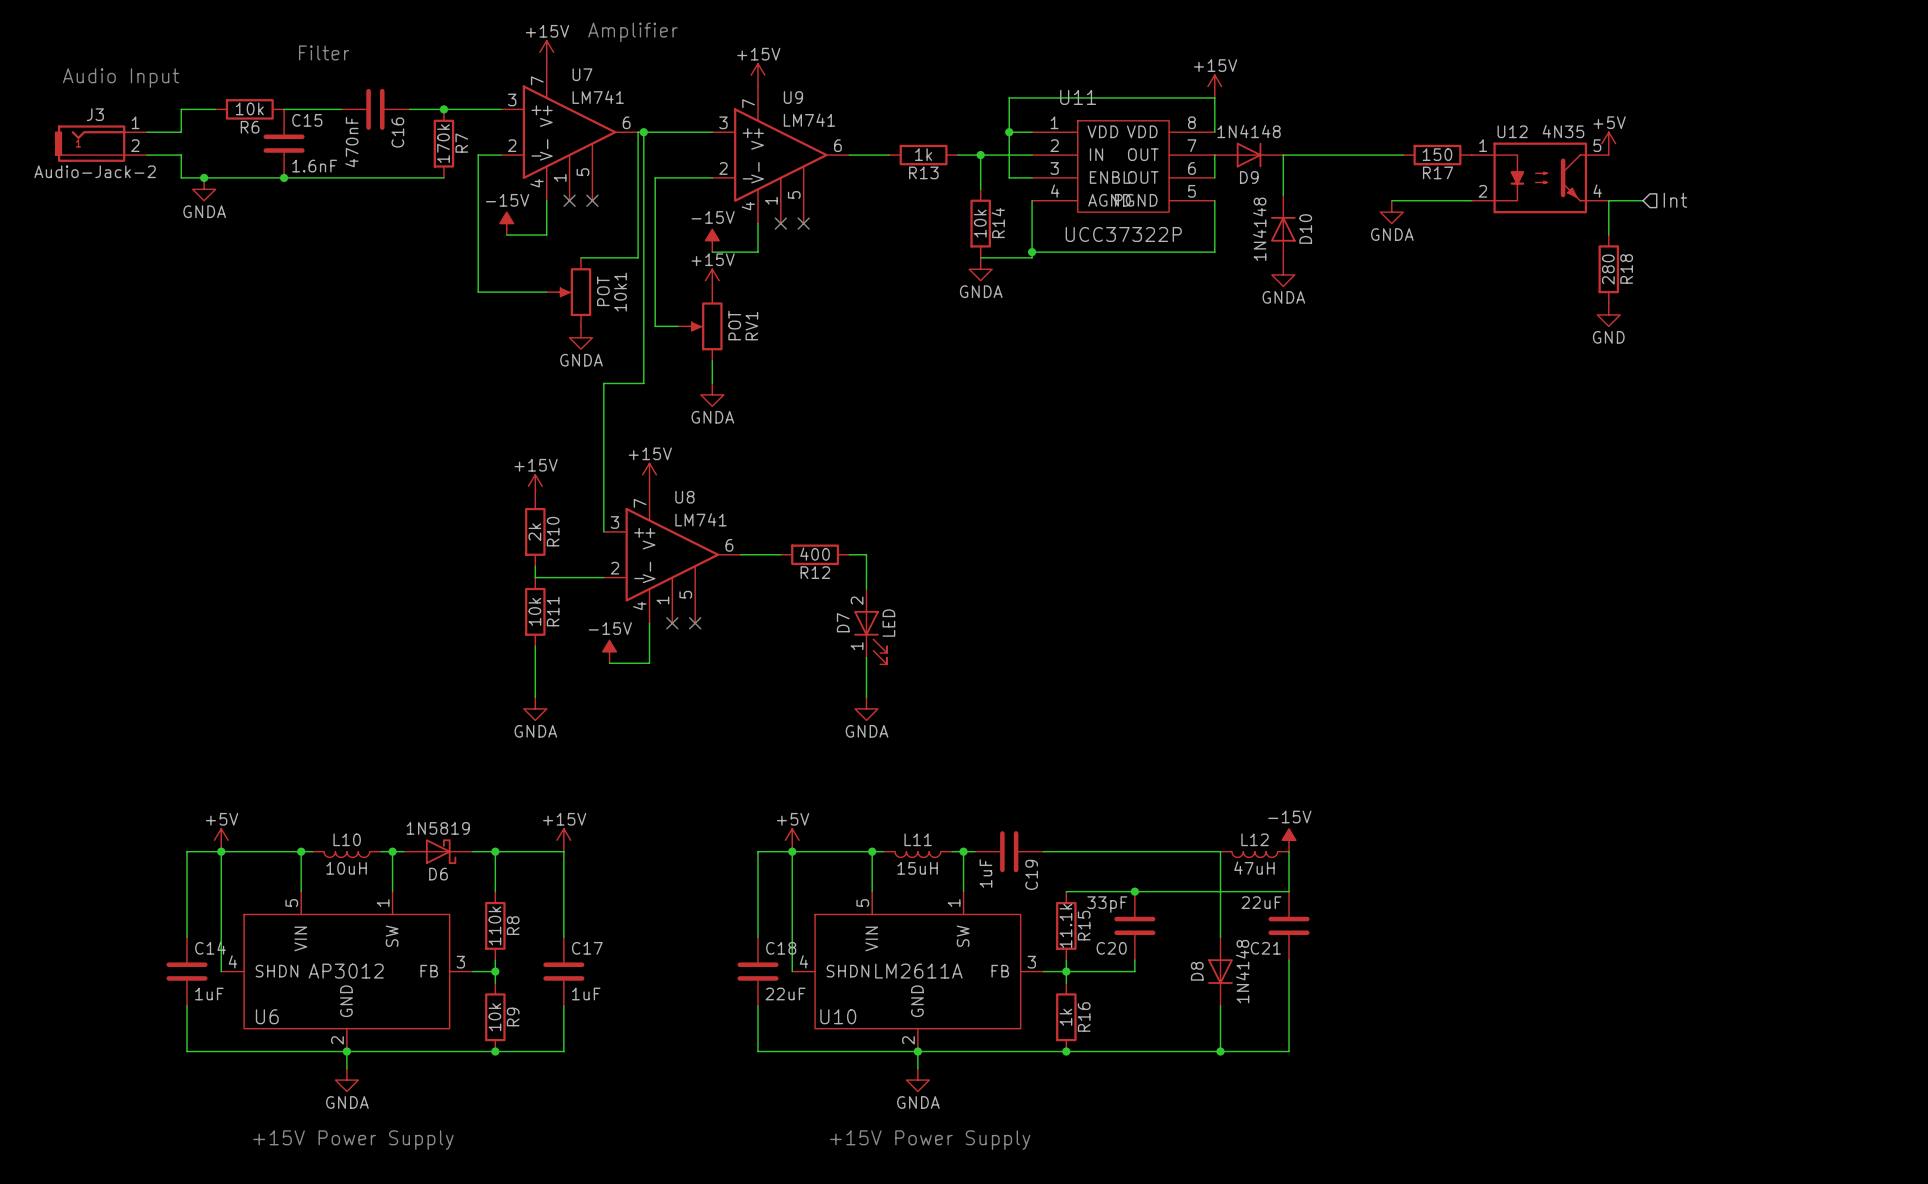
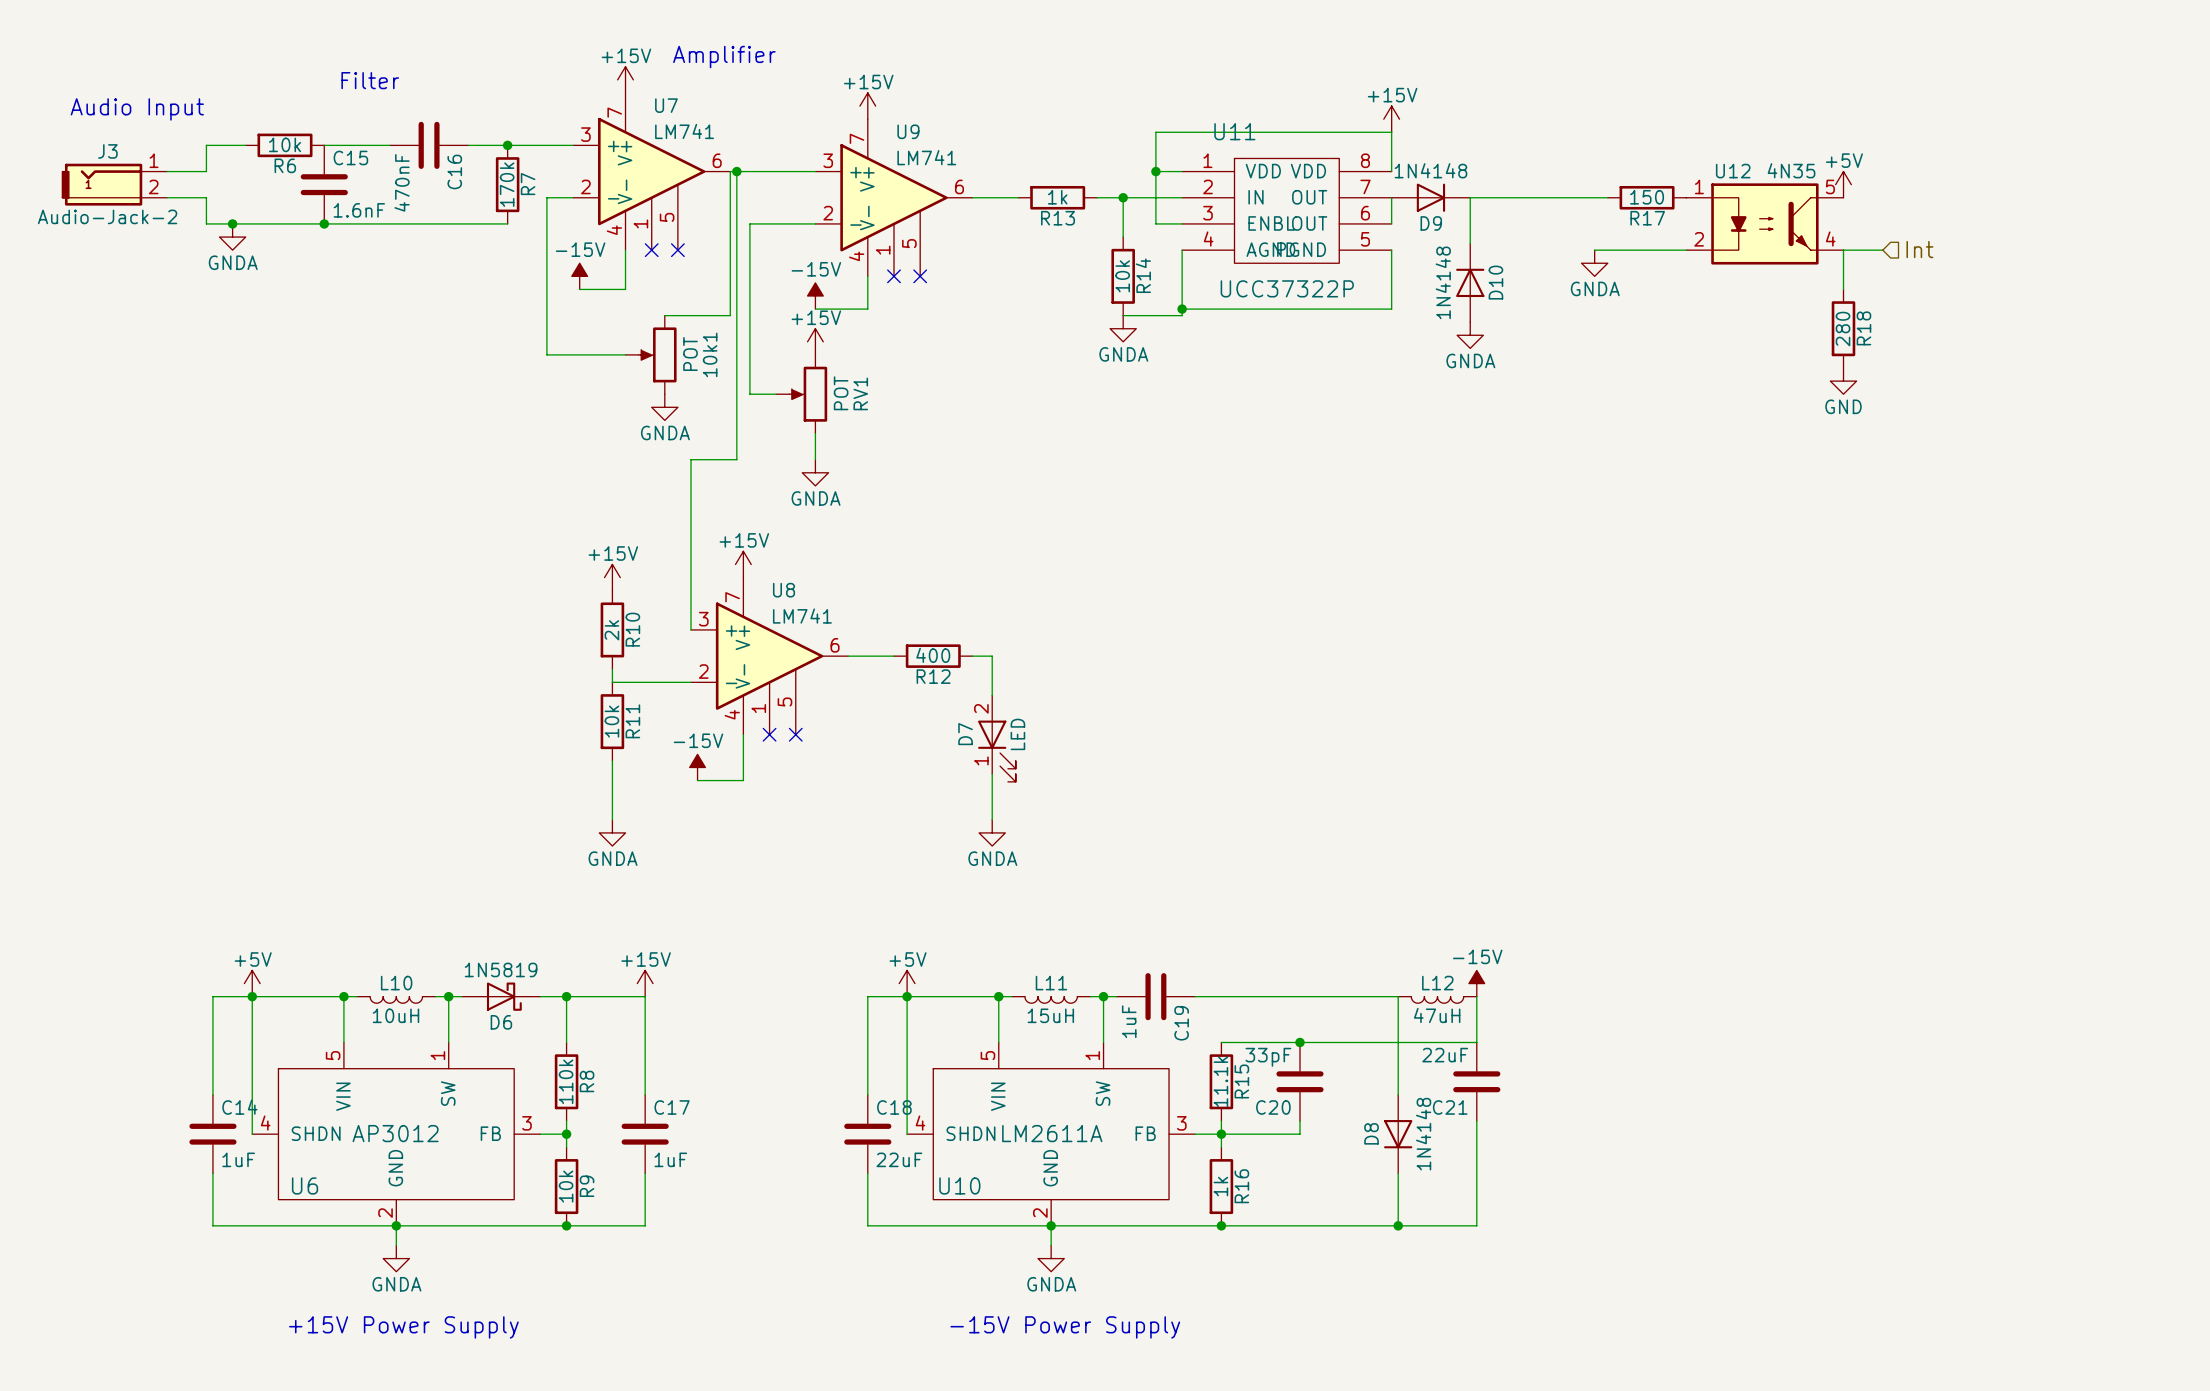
text: +15V Power Supply (930, 1140) -> -15V Power Supply (1065, 1327)

